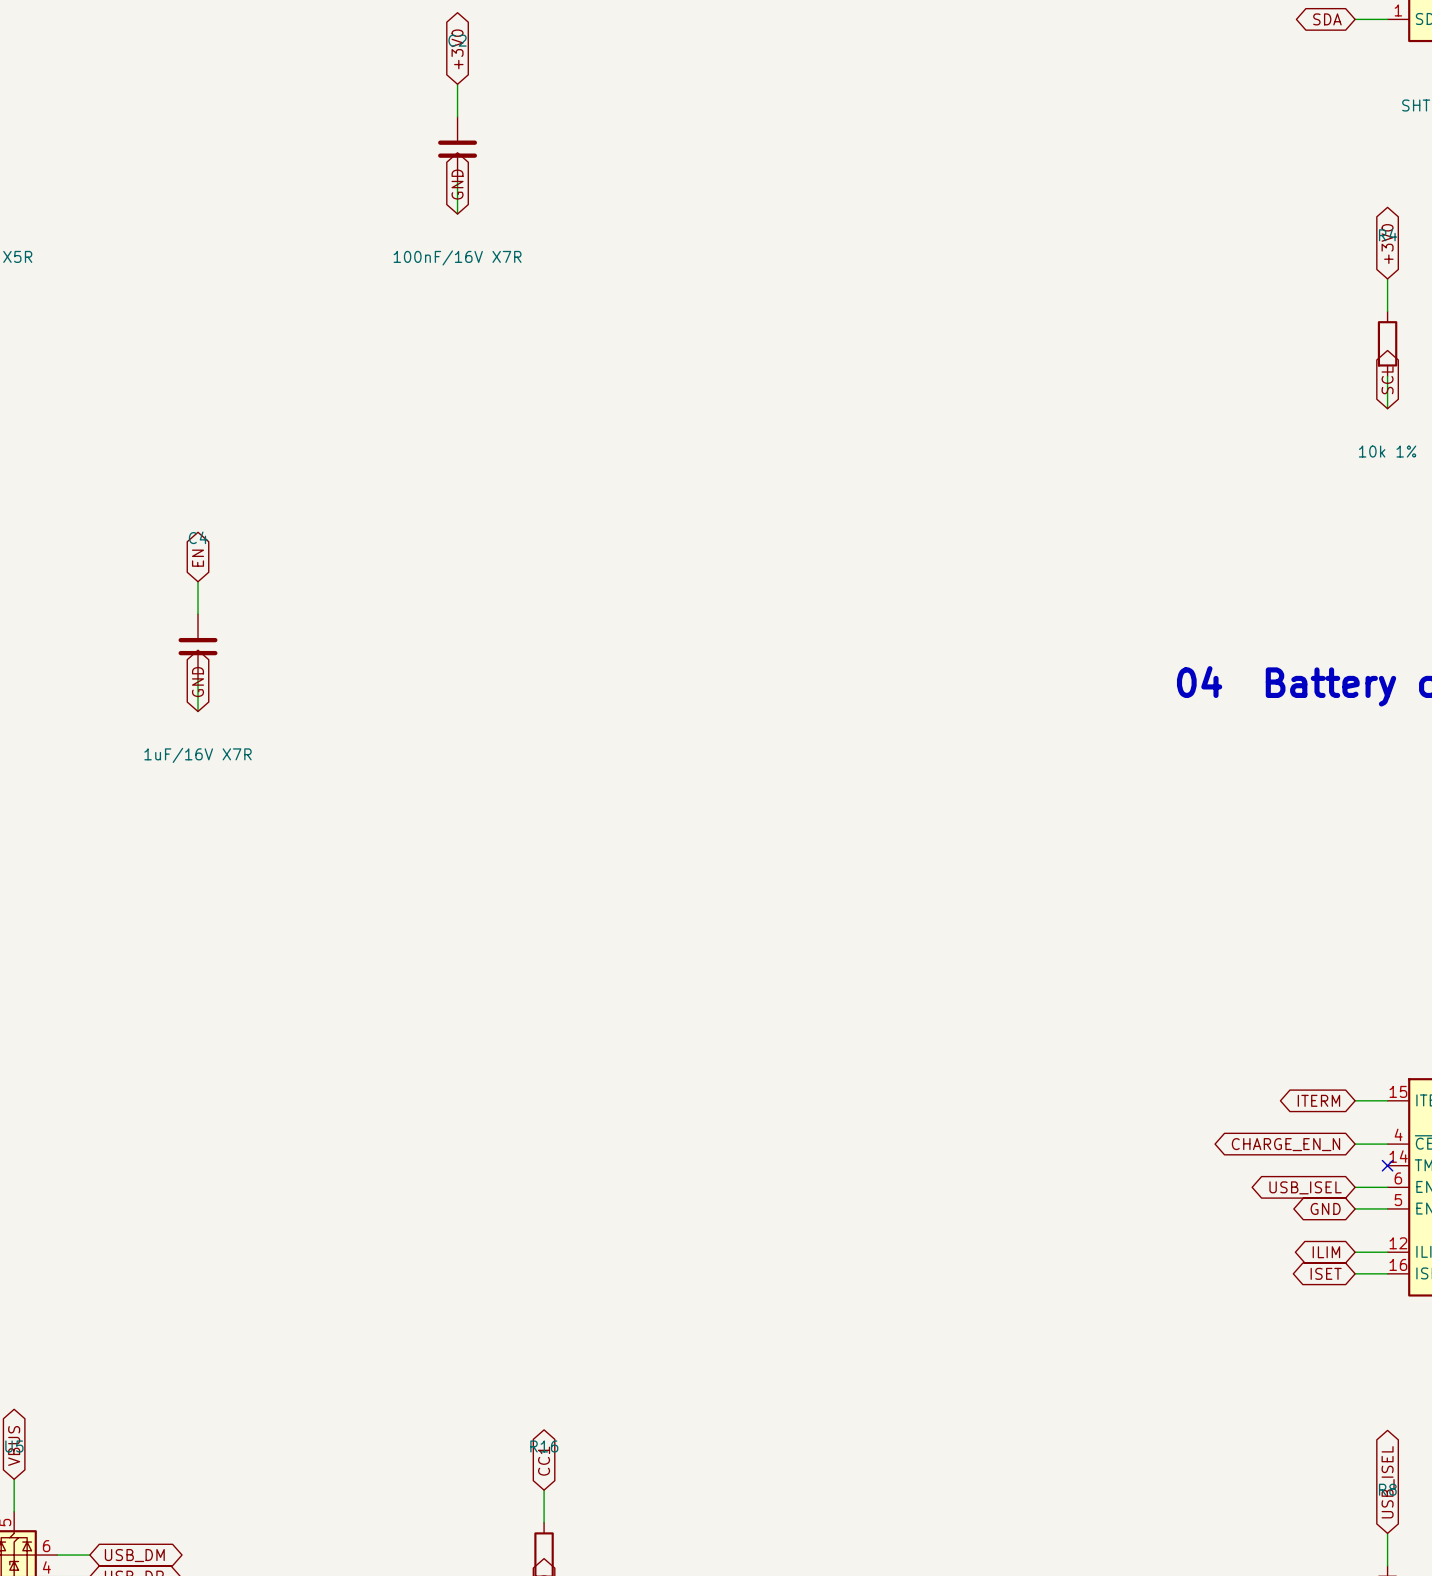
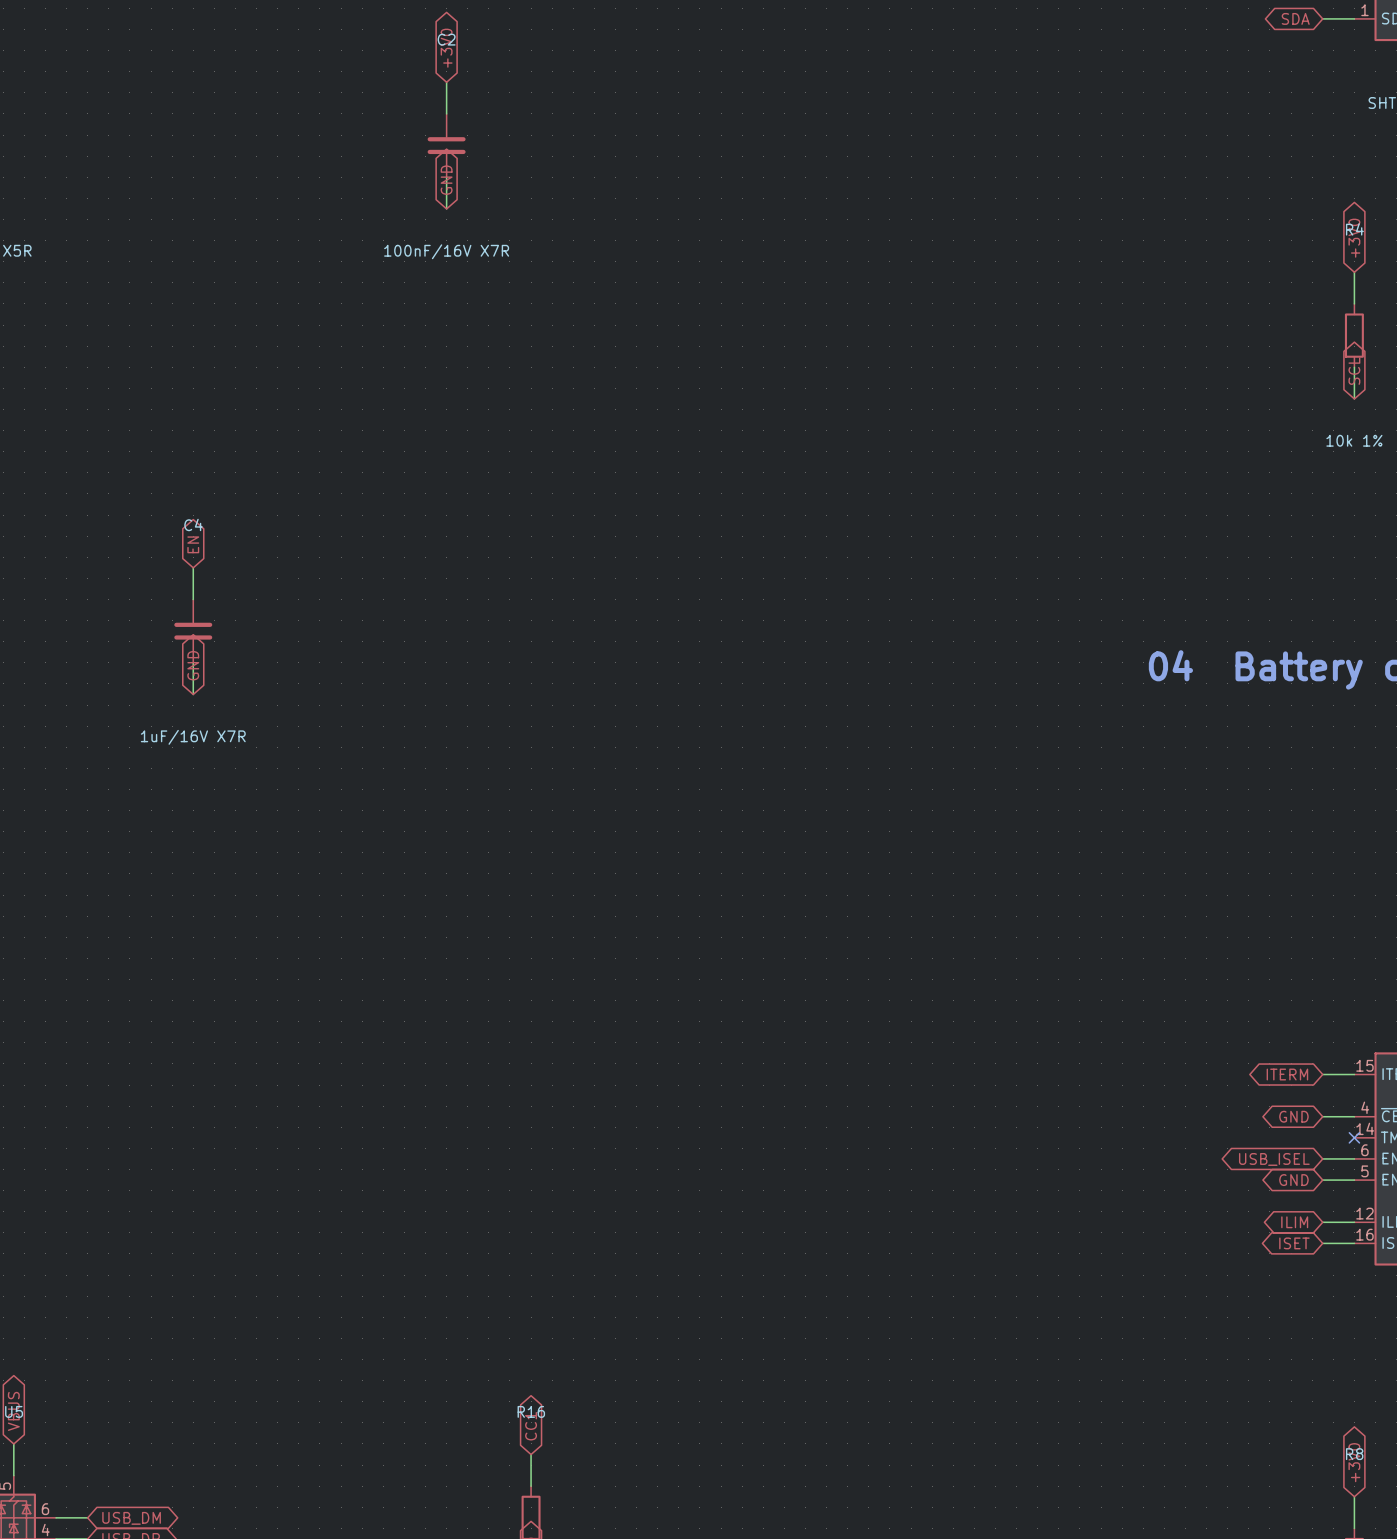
global label: CHARGE_EN_N (1285, 1144) -> GND (1293, 1116)
global label: USB_ISEL (1388, 1482) -> +3V0 (1354, 1462)

